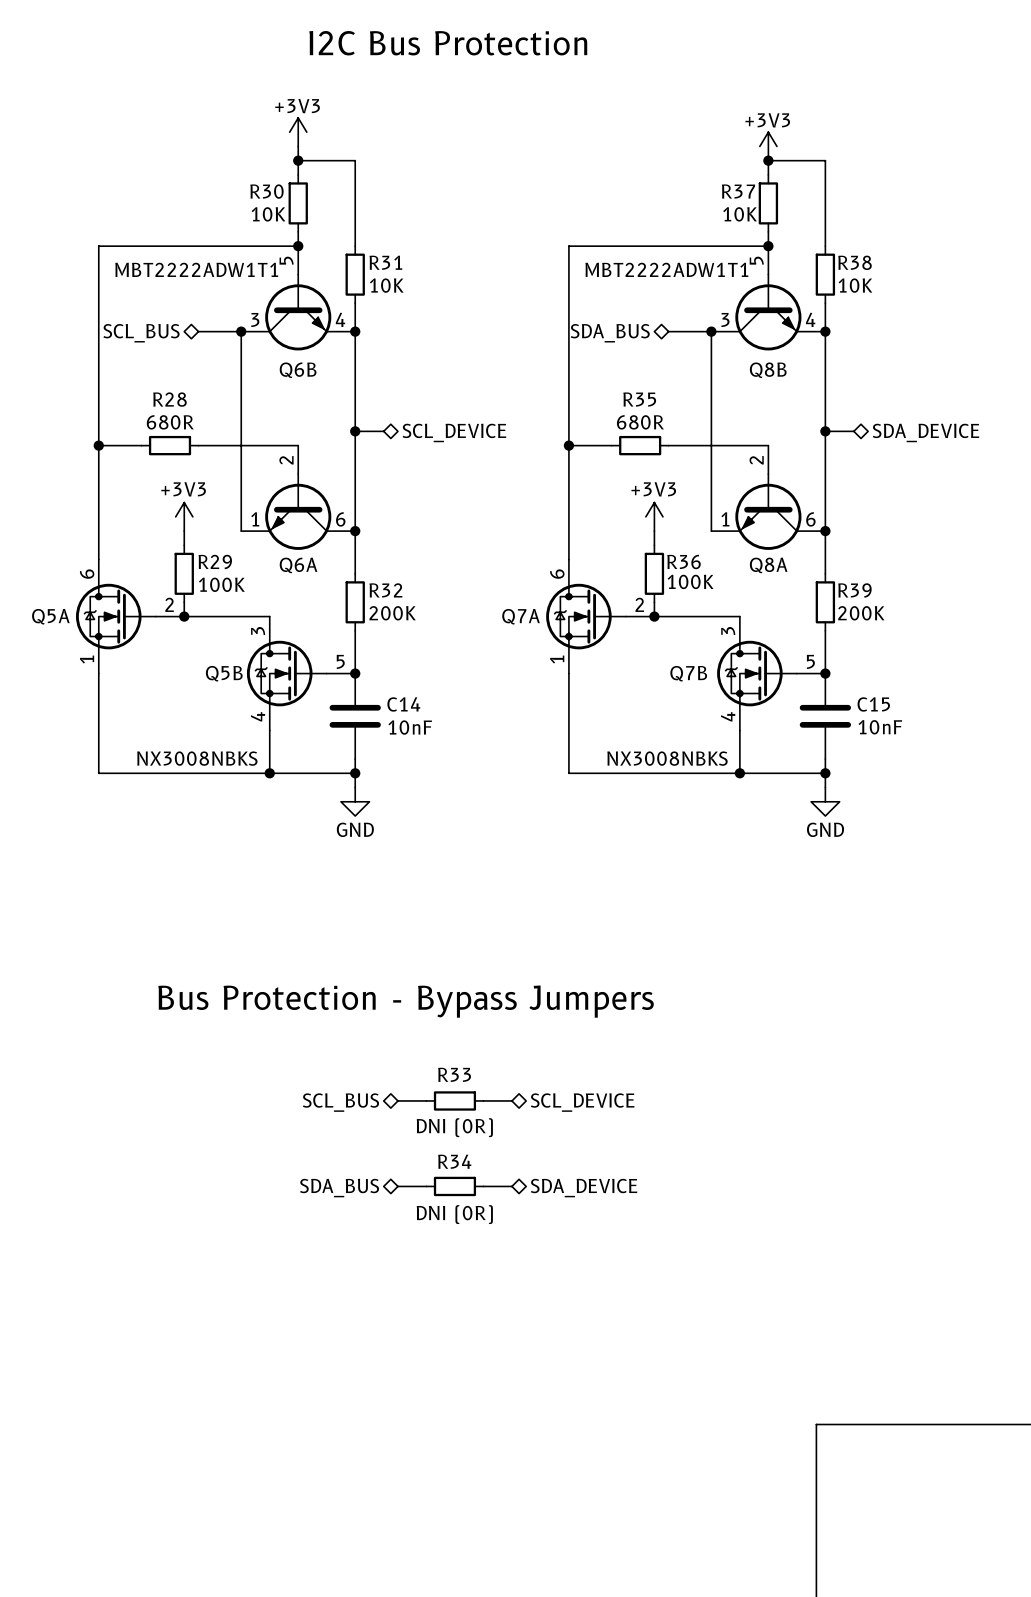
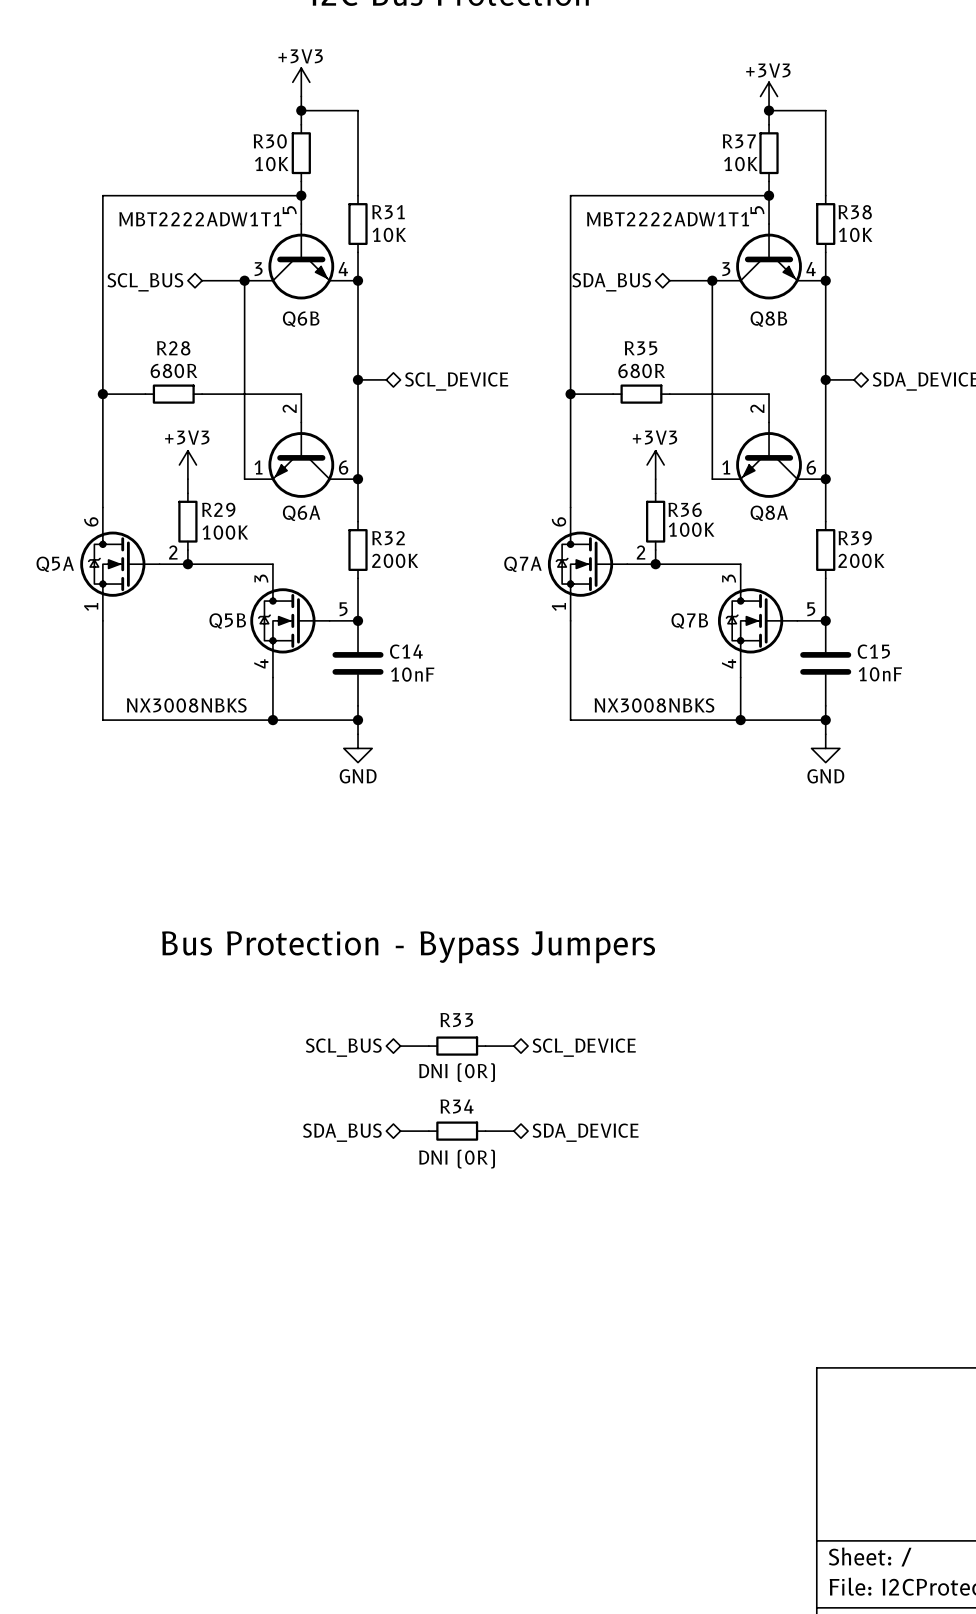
Q5A value position: NX3008NBKS (197, 758) -> NX3008NBKS (186, 705)
Q7A value position: NX3008NBKS (667, 758) -> NX3008NBKS (654, 705)

